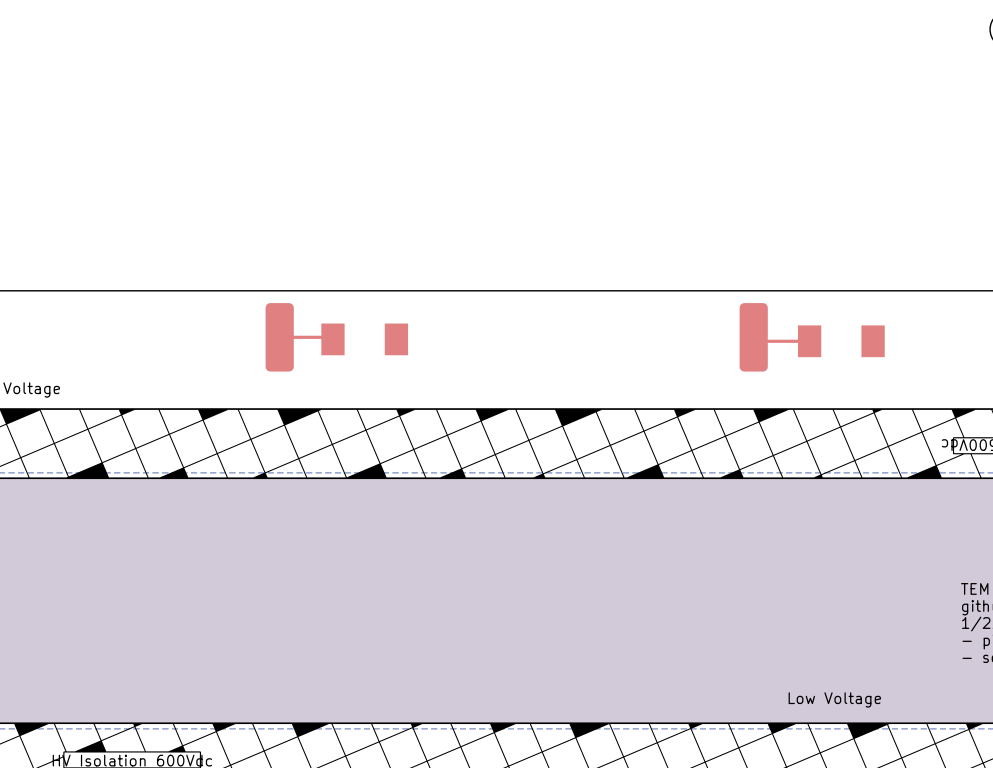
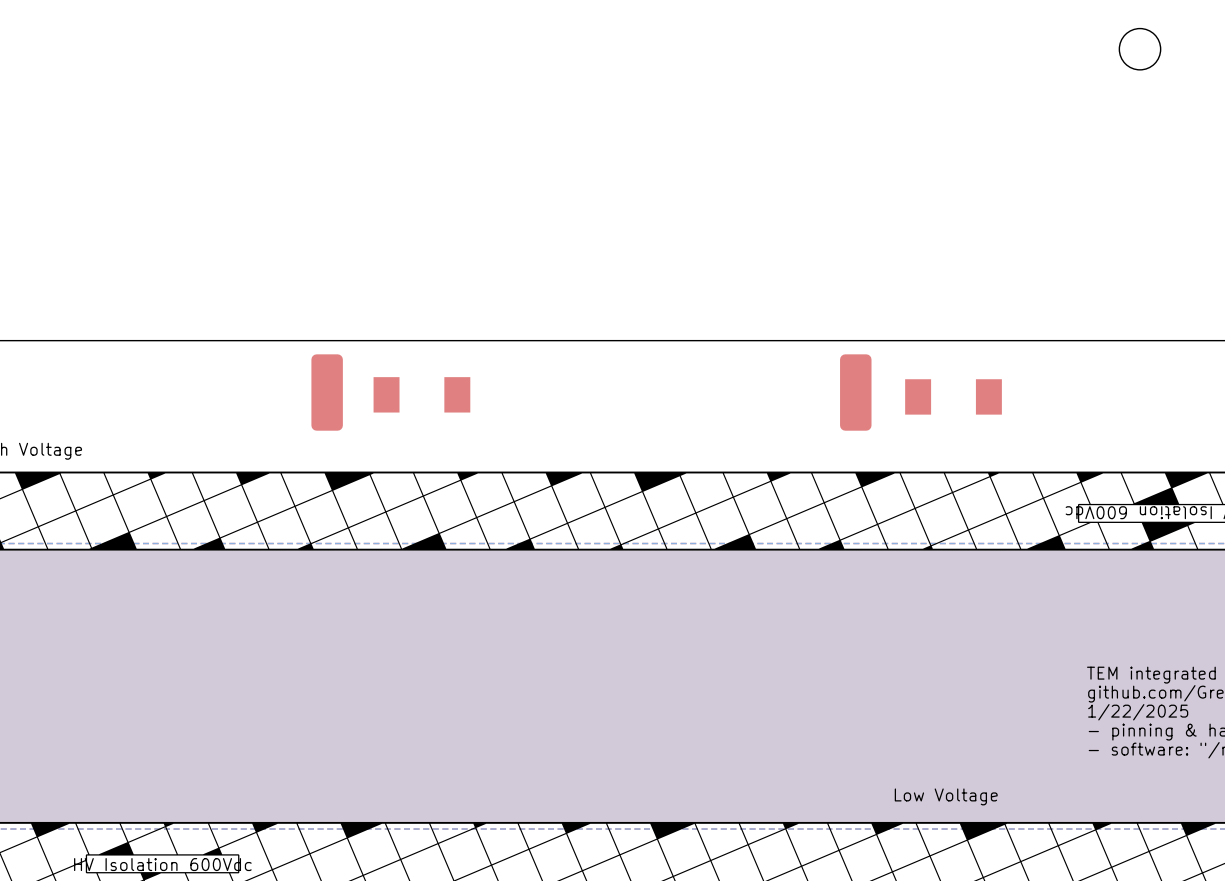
top track: (279, 337) (330, 337) (332, 339) -> none
top track: (753, 337) (757, 341) (809, 341) -> none

